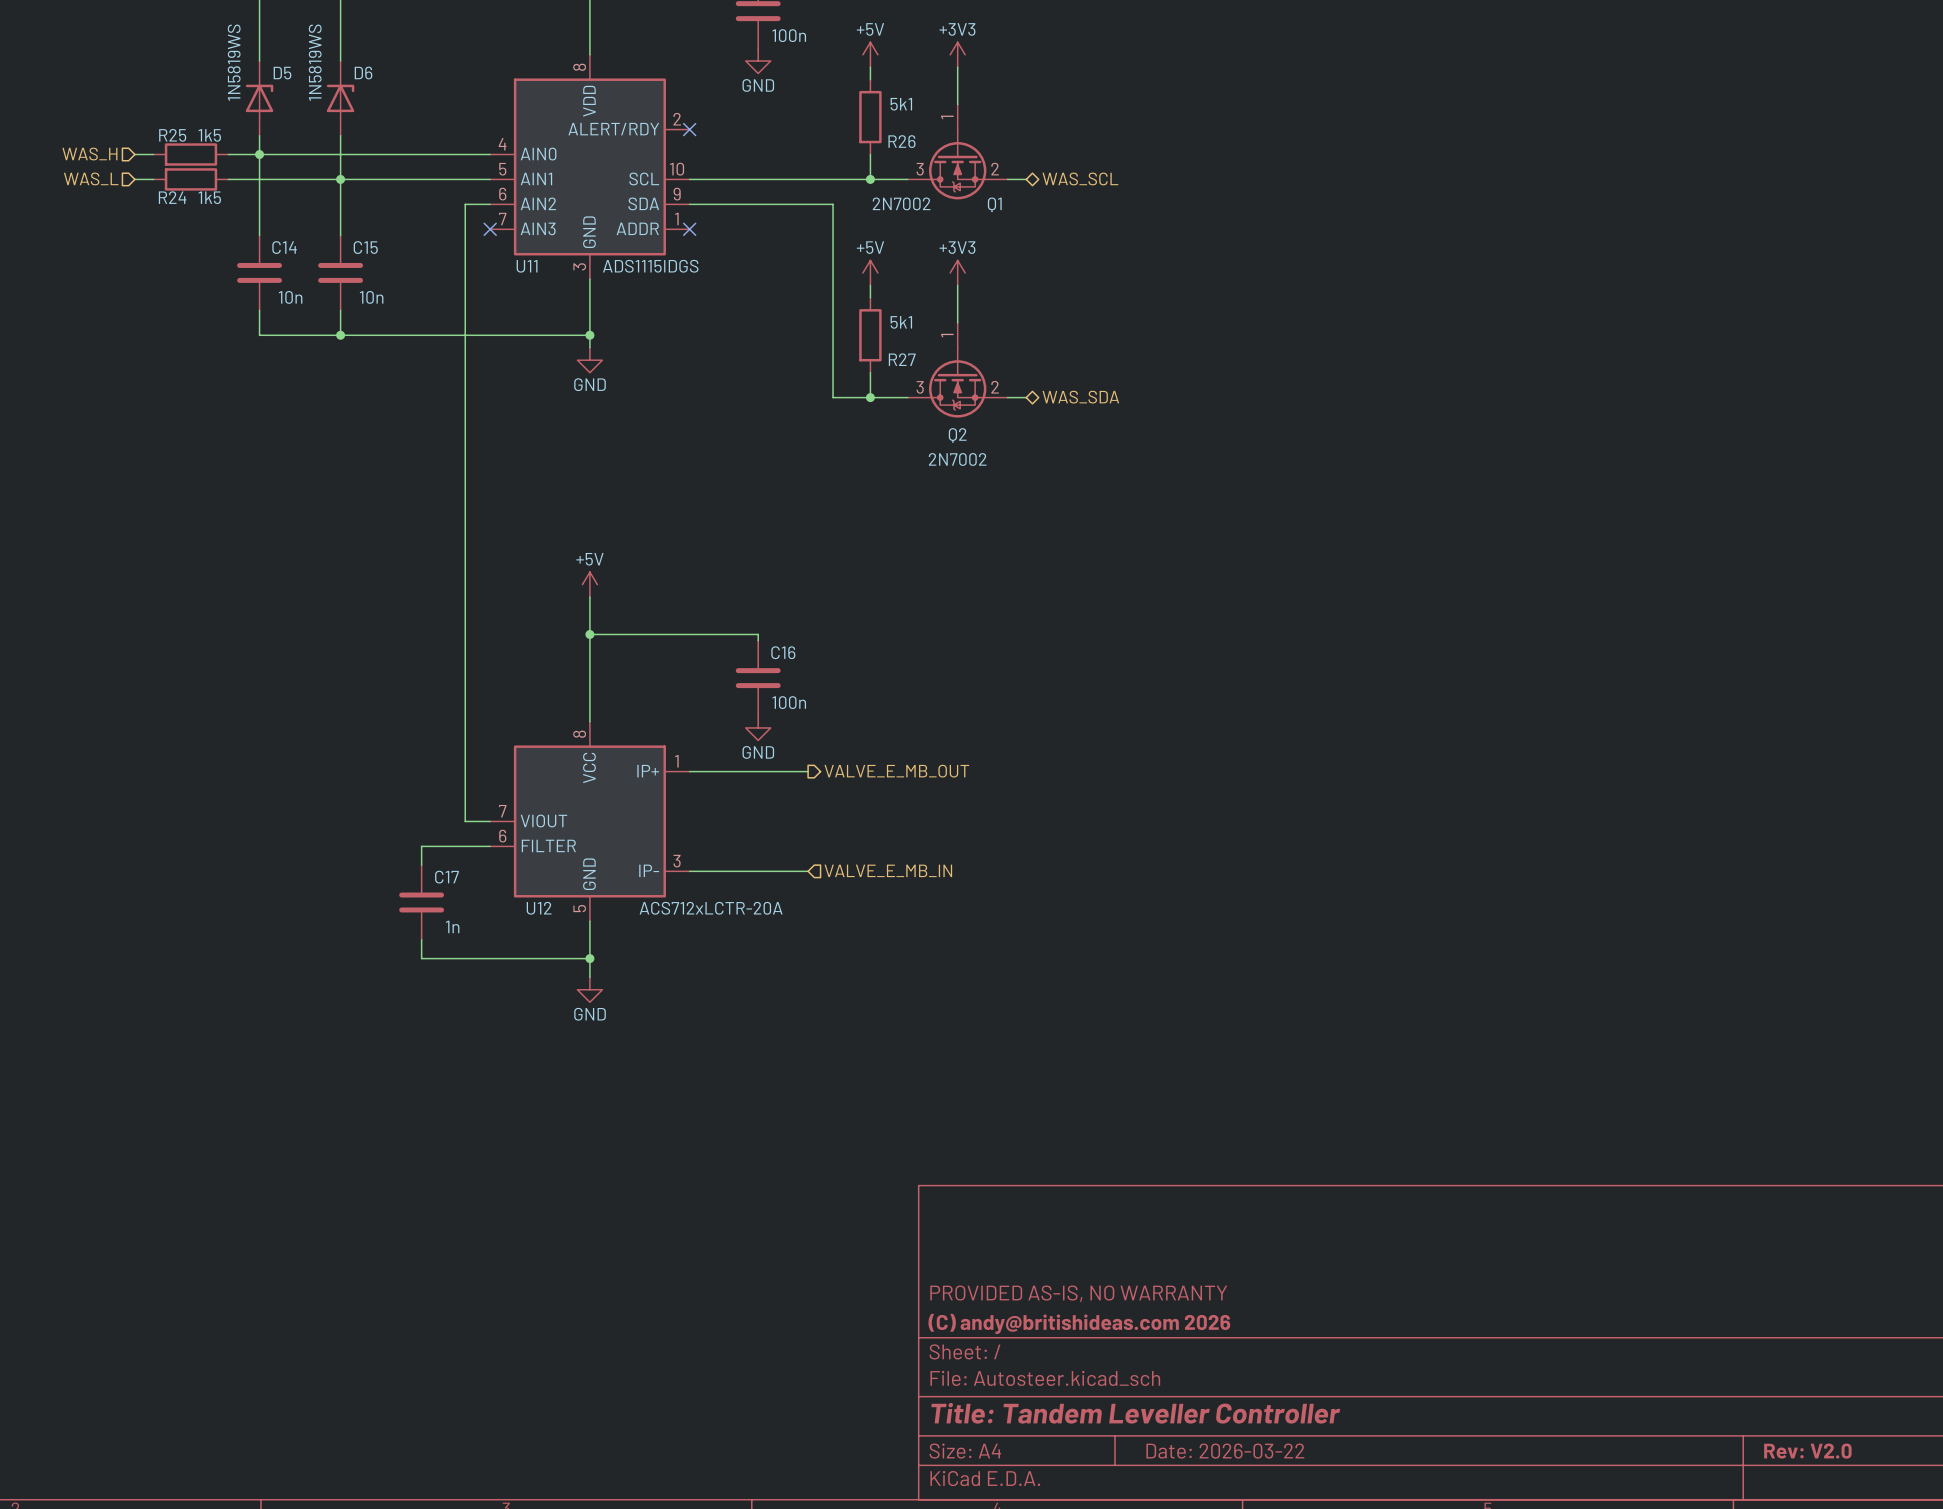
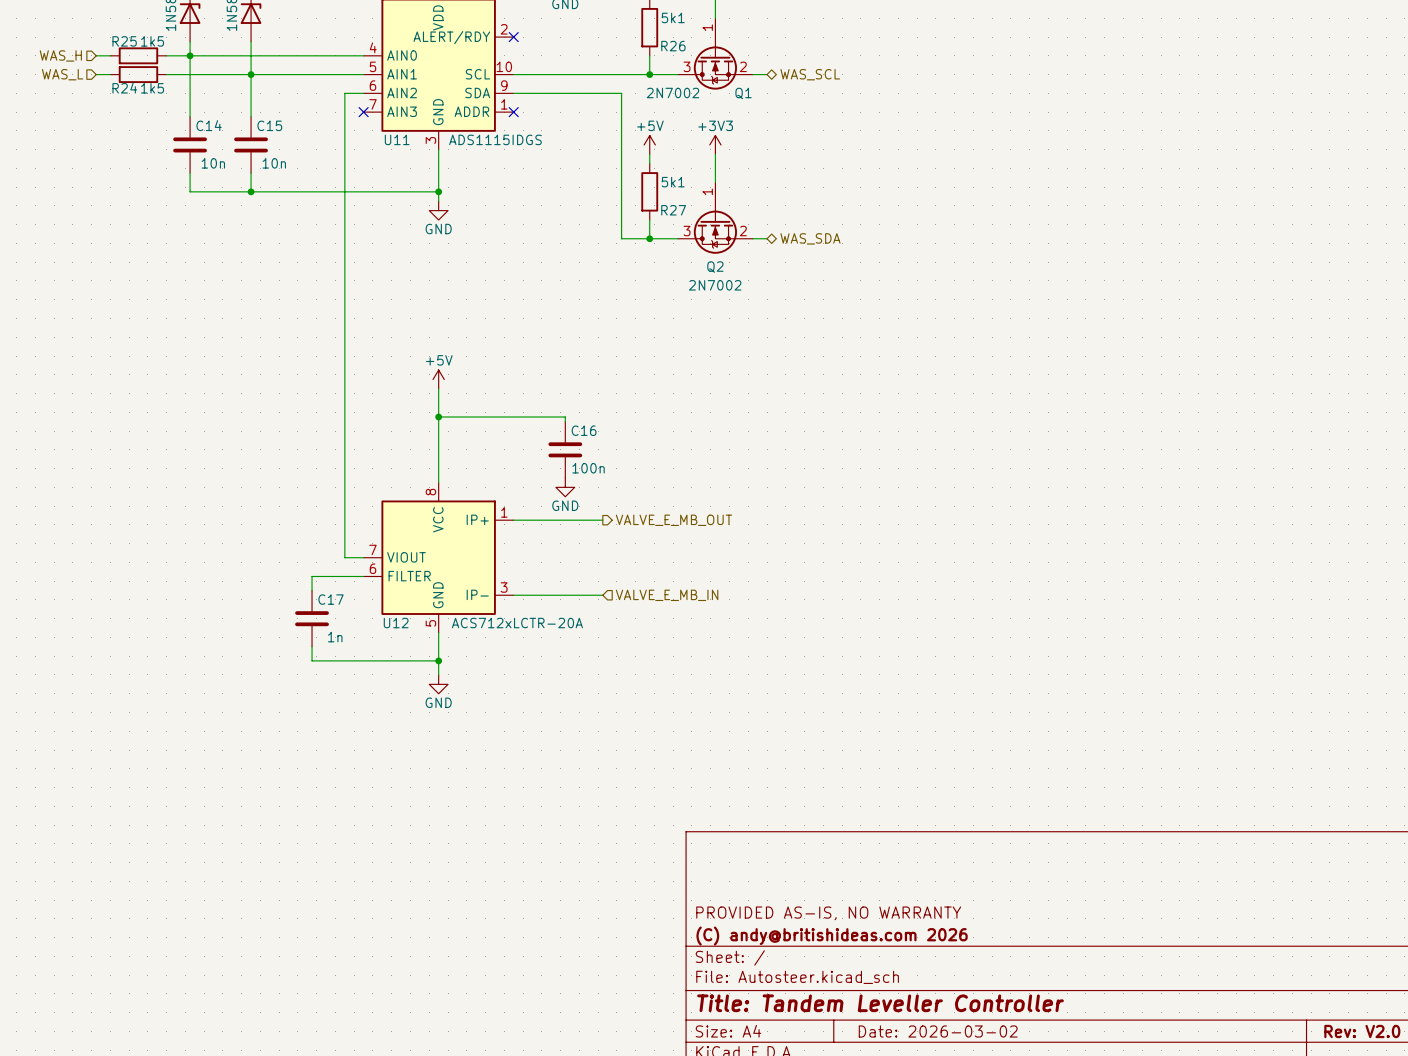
title block: Date: 2026-03-22 (1225, 1451) -> Date: 2026-03-02 (938, 1031)

